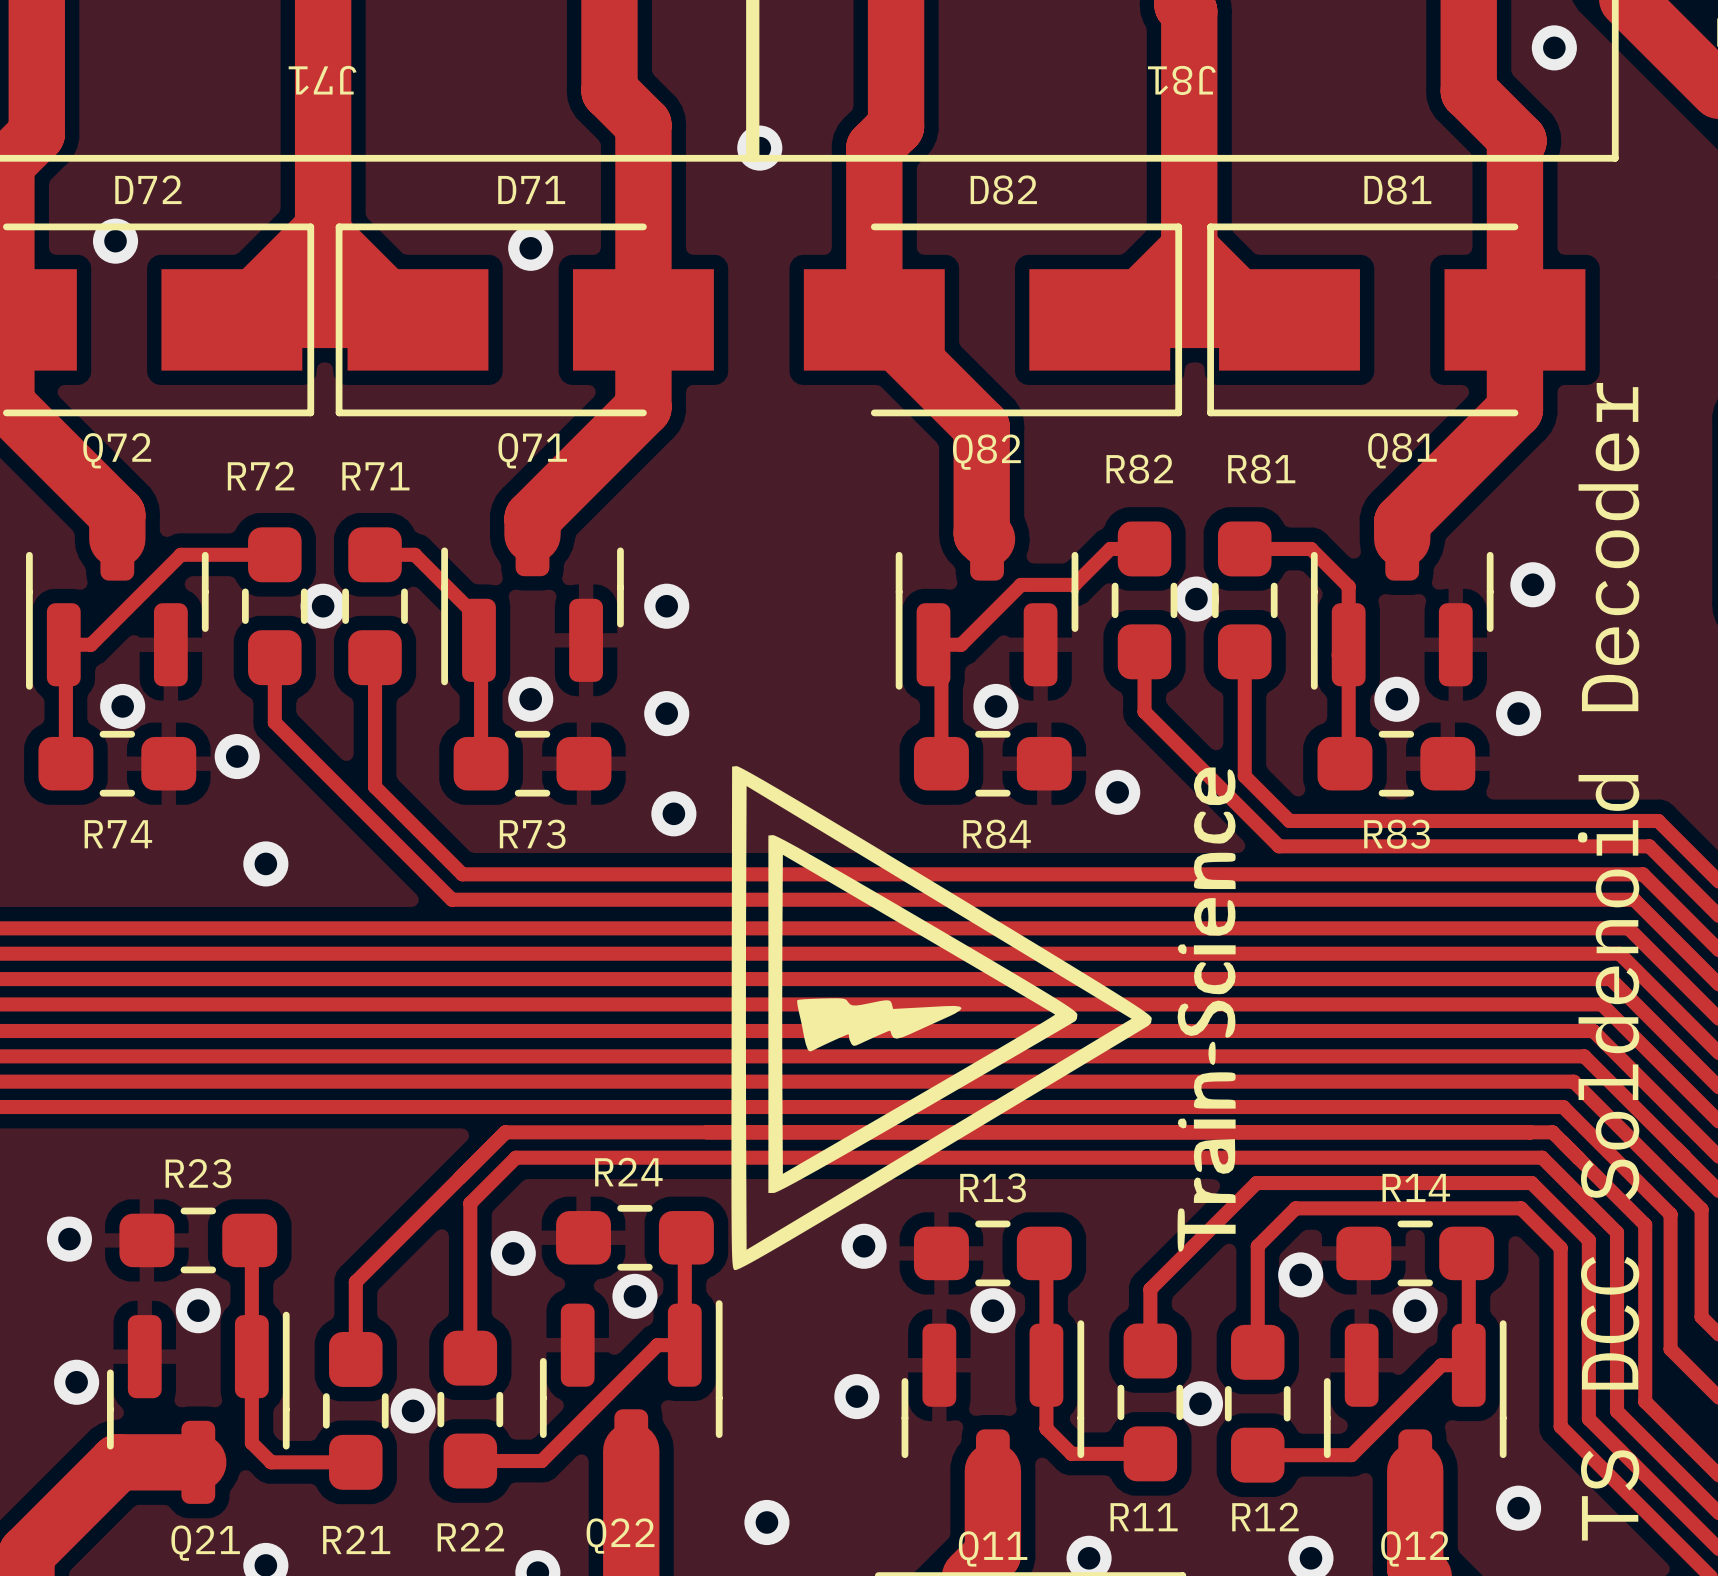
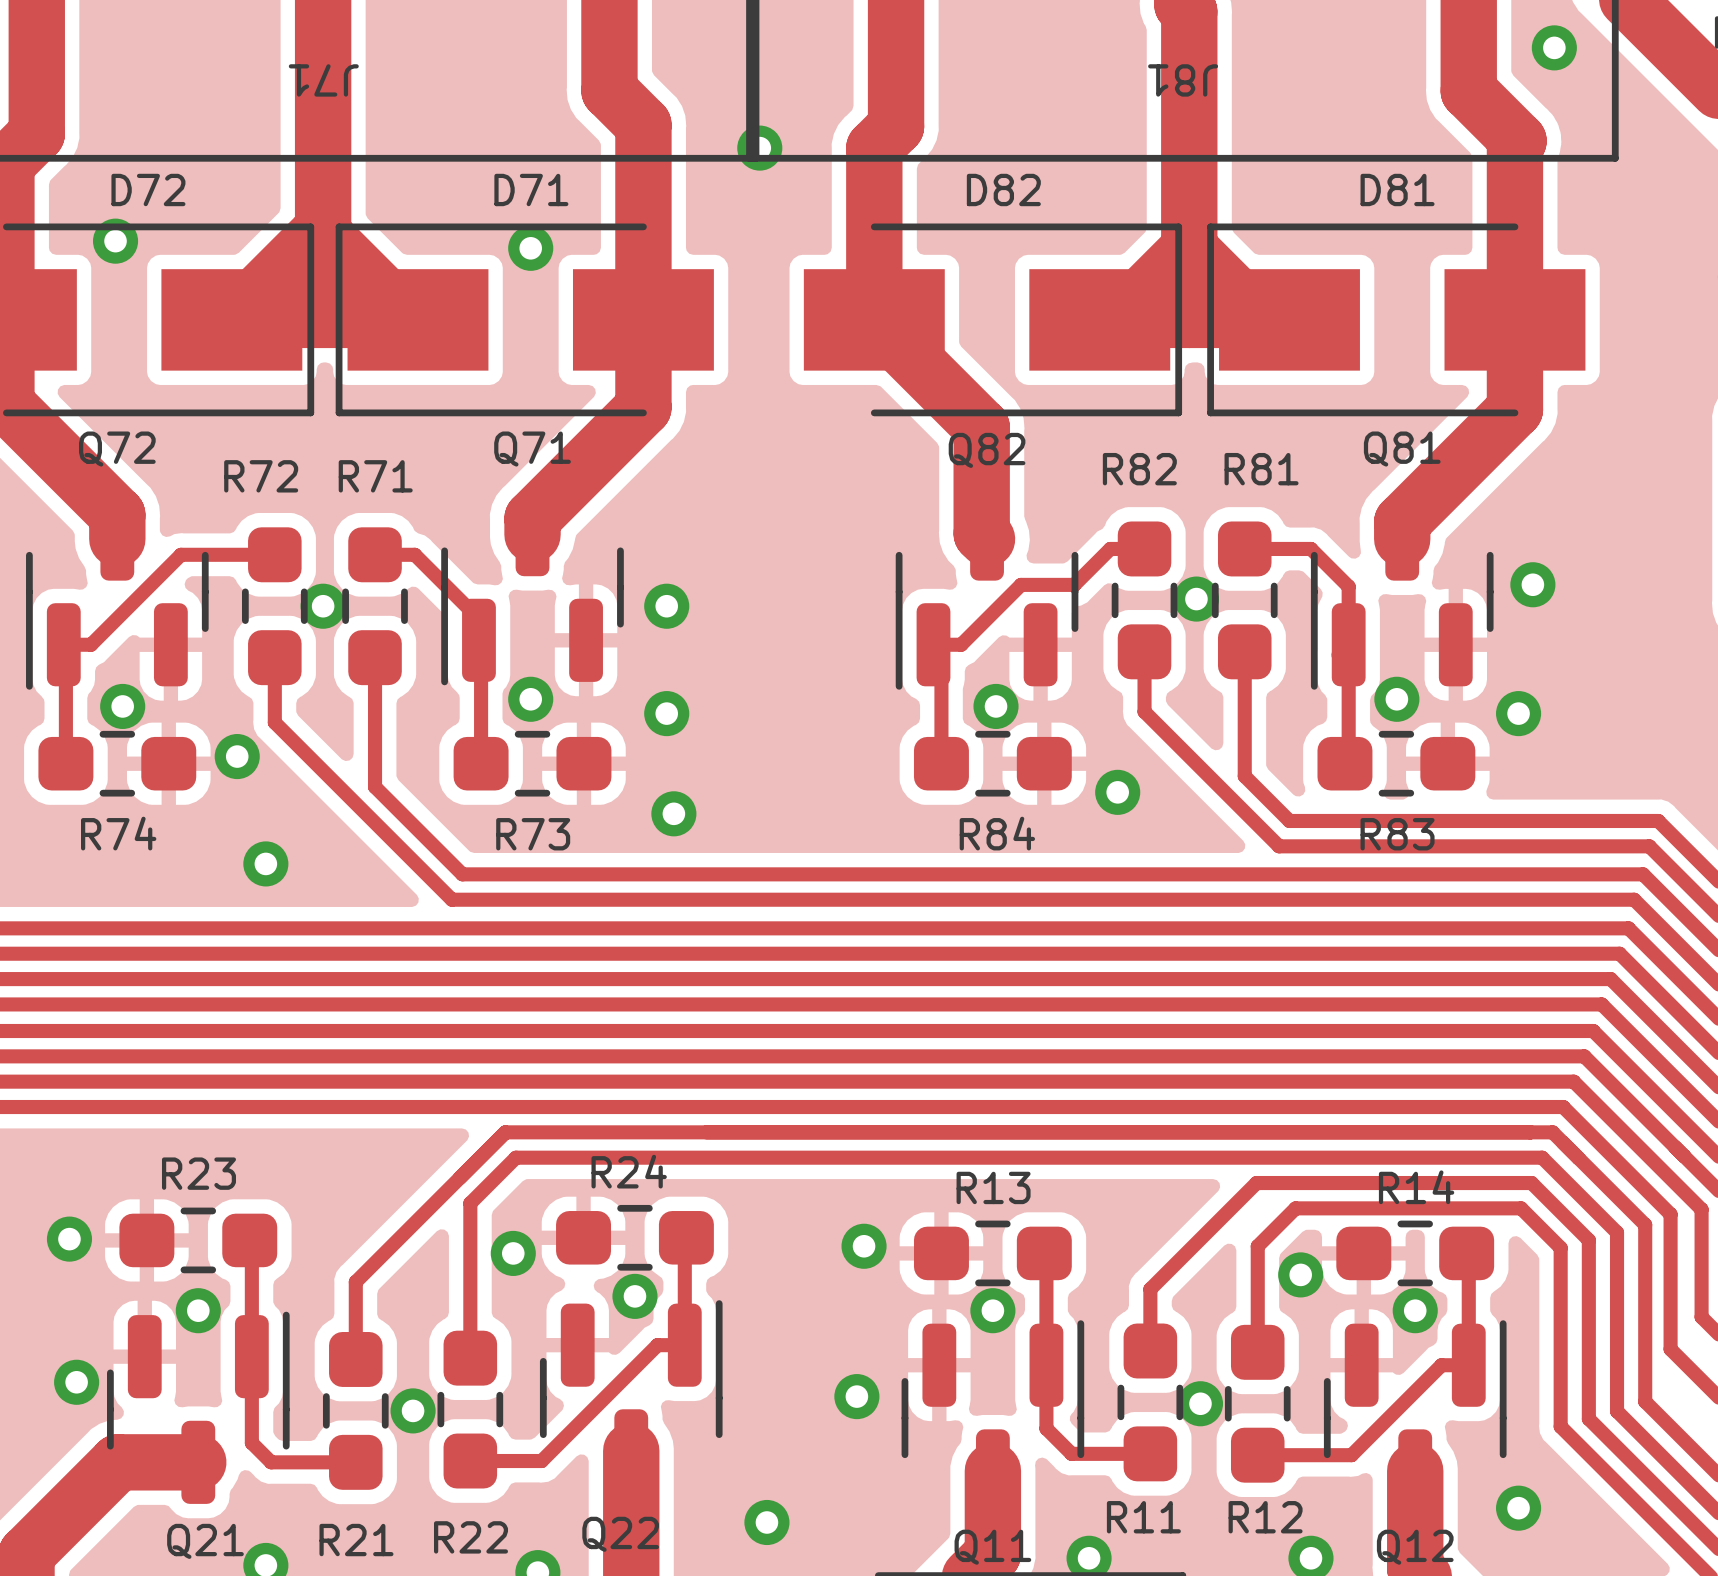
drawing: [731, 766, 1236, 1271] -> none
text: TS DCC Soldenoid Decoder (1608, 961) -> none

